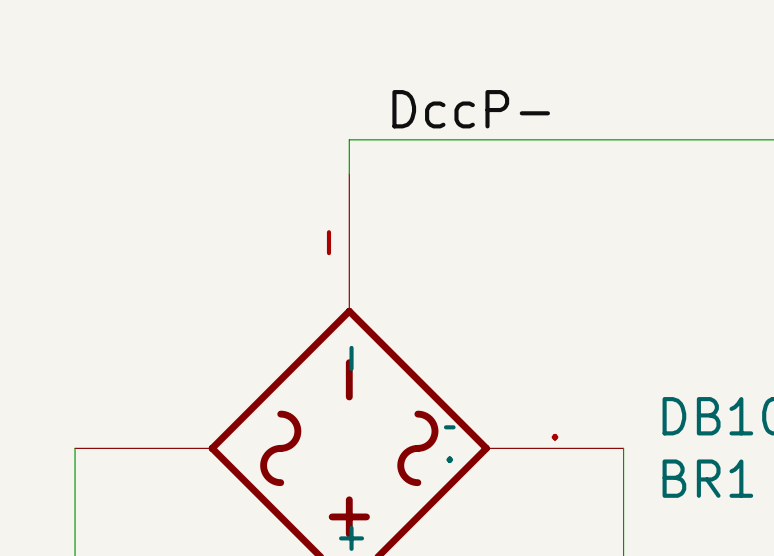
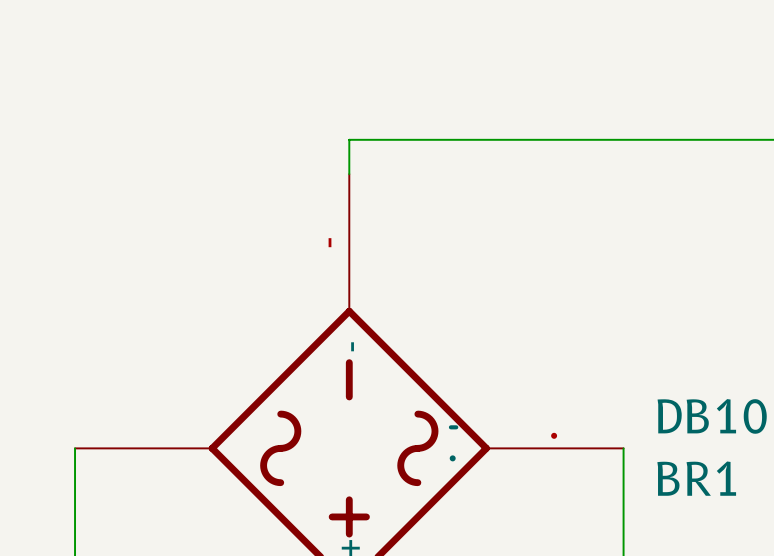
label: DccP- (471, 109) -> none

